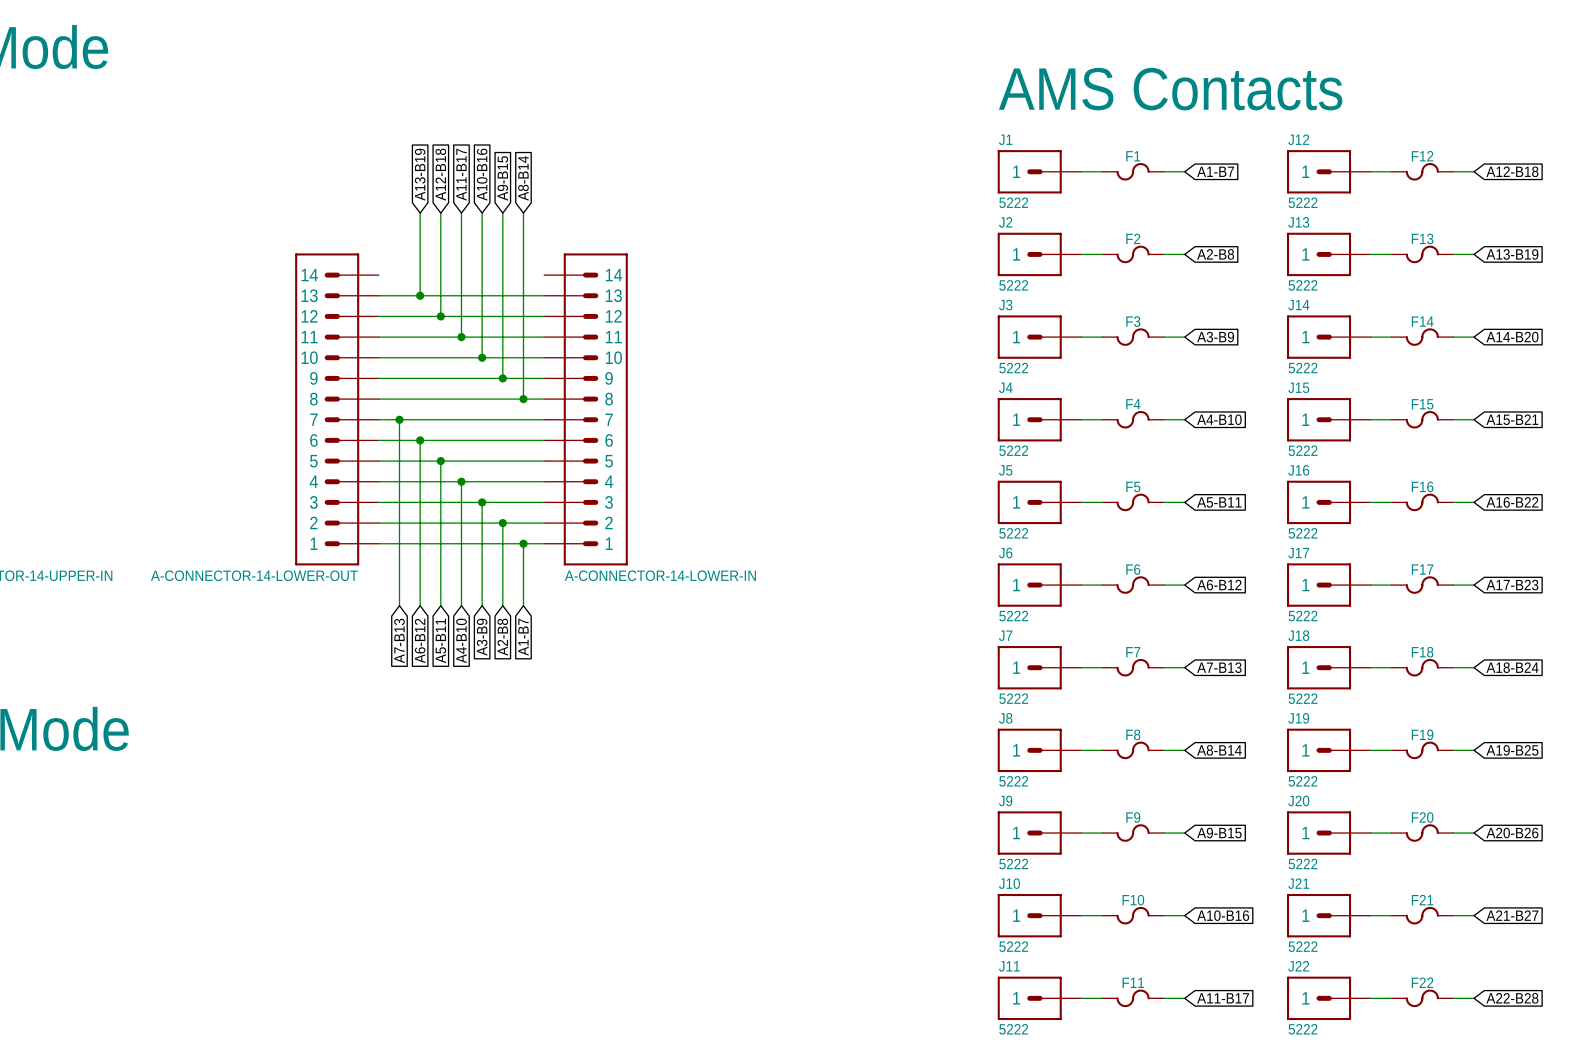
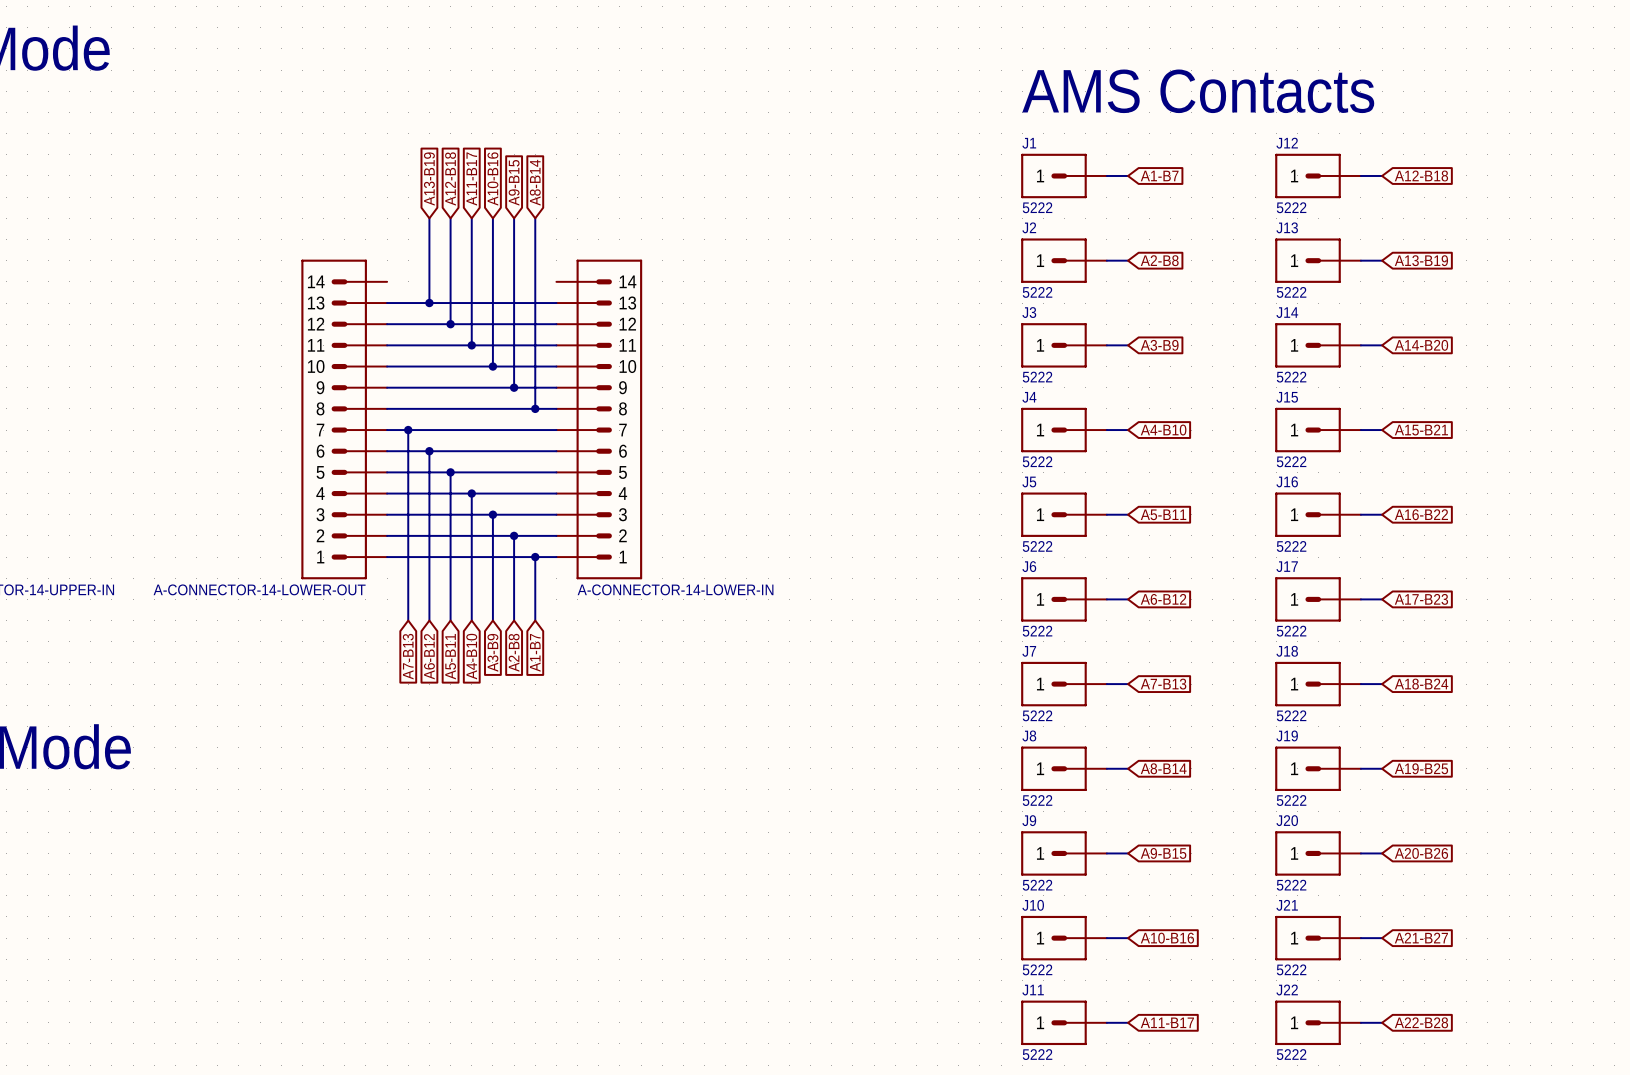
F1: (1133, 171) -> none
wire: (1164, 171) (1184, 171) -> none
global label position: A1-B7 (1215, 171) -> A1-B7 (1159, 175)
J12 position: (1328, 171) -> (1318, 175)
F12: (1422, 171) -> none
wire: (1453, 171) (1474, 171) -> none
global label position: A12-B18 (1512, 171) -> A12-B18 (1421, 175)
F2: (1133, 254) -> none
wire: (1164, 254) (1184, 254) -> none
global label position: A2-B8 (1215, 254) -> A2-B8 (1159, 260)
J13 position: (1328, 254) -> (1318, 260)
F13: (1422, 254) -> none
wire: (1453, 254) (1474, 254) -> none
global label position: A13-B19 (1512, 254) -> A13-B19 (1421, 260)
F3: (1133, 337) -> none
wire: (1164, 337) (1184, 337) -> none
global label position: A3-B9 (1215, 337) -> A3-B9 (1159, 345)
J14 position: (1328, 337) -> (1318, 345)
F14: (1422, 337) -> none
wire: (1453, 337) (1474, 337) -> none
global label position: A14-B20 (1512, 337) -> A14-B20 (1421, 345)
F4: (1133, 419) -> none
wire: (1164, 419) (1184, 419) -> none
global label position: A4-B10 (1219, 419) -> A4-B10 (1163, 430)
J15 position: (1328, 419) -> (1318, 430)
F15: (1422, 419) -> none
wire: (1453, 419) (1474, 419) -> none
global label position: A15-B21 (1512, 419) -> A15-B21 (1421, 430)
F5: (1133, 502) -> none
wire: (1164, 502) (1184, 502) -> none
global label position: A5-B11 (1219, 502) -> A5-B11 (1163, 514)
J16 position: (1328, 502) -> (1318, 514)
F16: (1422, 502) -> none
wire: (1453, 502) (1474, 502) -> none
global label position: A16-B22 (1512, 502) -> A16-B22 (1421, 514)
F6: (1133, 585) -> none
wire: (1164, 585) (1184, 585) -> none
global label position: A6-B12 (1219, 585) -> A6-B12 (1163, 599)
J17 position: (1328, 585) -> (1318, 599)
F17: (1422, 585) -> none
wire: (1453, 585) (1474, 585) -> none
global label position: A17-B23 (1512, 585) -> A17-B23 (1421, 599)
F7: (1133, 667) -> none
wire: (1164, 667) (1184, 667) -> none
global label position: A7-B13 (1219, 667) -> A7-B13 (1163, 684)
J18 position: (1328, 667) -> (1318, 684)
F18: (1422, 667) -> none
wire: (1453, 667) (1474, 667) -> none
global label position: A18-B24 (1512, 667) -> A18-B24 (1421, 684)
F8: (1133, 750) -> none
wire: (1164, 750) (1184, 750) -> none
global label position: A8-B14 (1219, 750) -> A8-B14 (1163, 768)
J19 position: (1328, 750) -> (1318, 768)
F19: (1422, 750) -> none
wire: (1453, 750) (1474, 750) -> none
global label position: A19-B25 (1512, 750) -> A19-B25 (1421, 768)
F9: (1133, 833) -> none
wire: (1164, 833) (1184, 833) -> none
global label position: A9-B15 (1219, 833) -> A9-B15 (1163, 853)
J20 position: (1328, 833) -> (1318, 853)
F20: (1422, 833) -> none
wire: (1453, 833) (1474, 833) -> none
global label position: A20-B26 (1512, 833) -> A20-B26 (1421, 853)
F10: (1133, 915) -> none
wire: (1164, 915) (1184, 915) -> none
global label position: A10-B16 (1223, 915) -> A10-B16 (1167, 938)
J21 position: (1328, 915) -> (1318, 938)
F21: (1422, 915) -> none
wire: (1453, 915) (1474, 915) -> none
global label position: A21-B27 (1512, 915) -> A21-B27 (1421, 938)
F11: (1133, 998) -> none
wire: (1164, 998) (1184, 998) -> none
global label position: A11-B17 (1223, 998) -> A11-B17 (1167, 1022)
J22 position: (1328, 998) -> (1318, 1022)
F22: (1422, 998) -> none
wire: (1453, 998) (1474, 998) -> none
global label position: A22-B28 (1512, 998) -> A22-B28 (1421, 1022)

